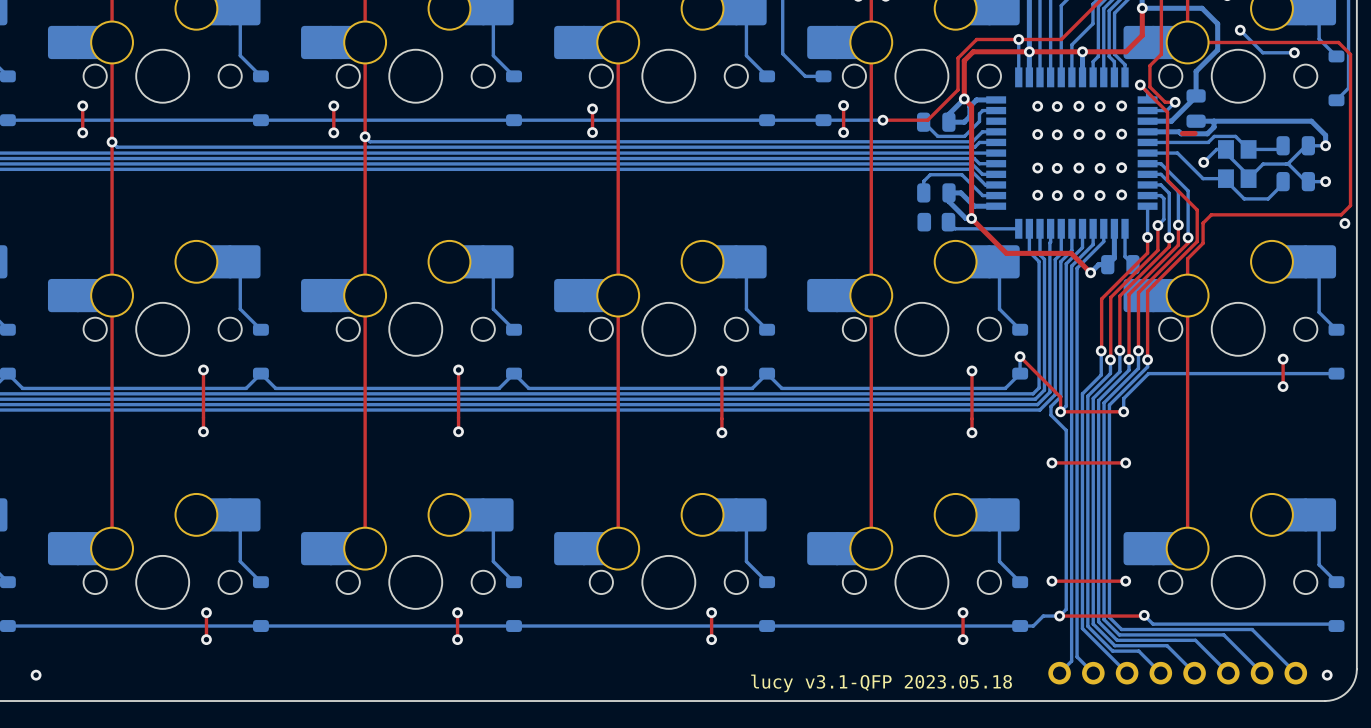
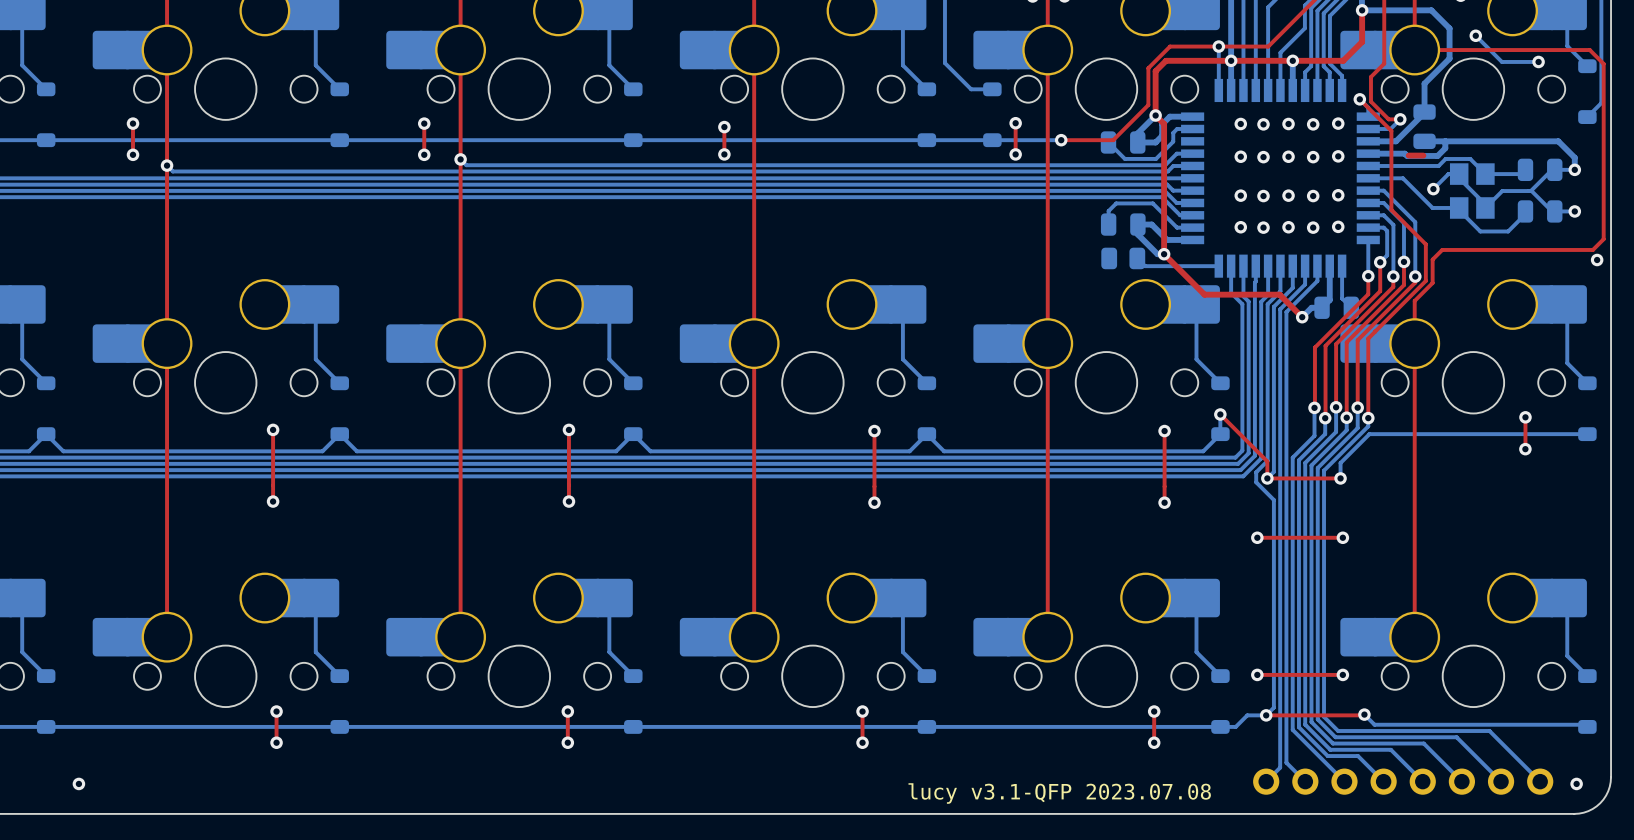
text: lucy v3.1-QFP 2023.05.18 (881, 683) -> lucy v3.1-QFP 2023.07.08 (1059, 793)

